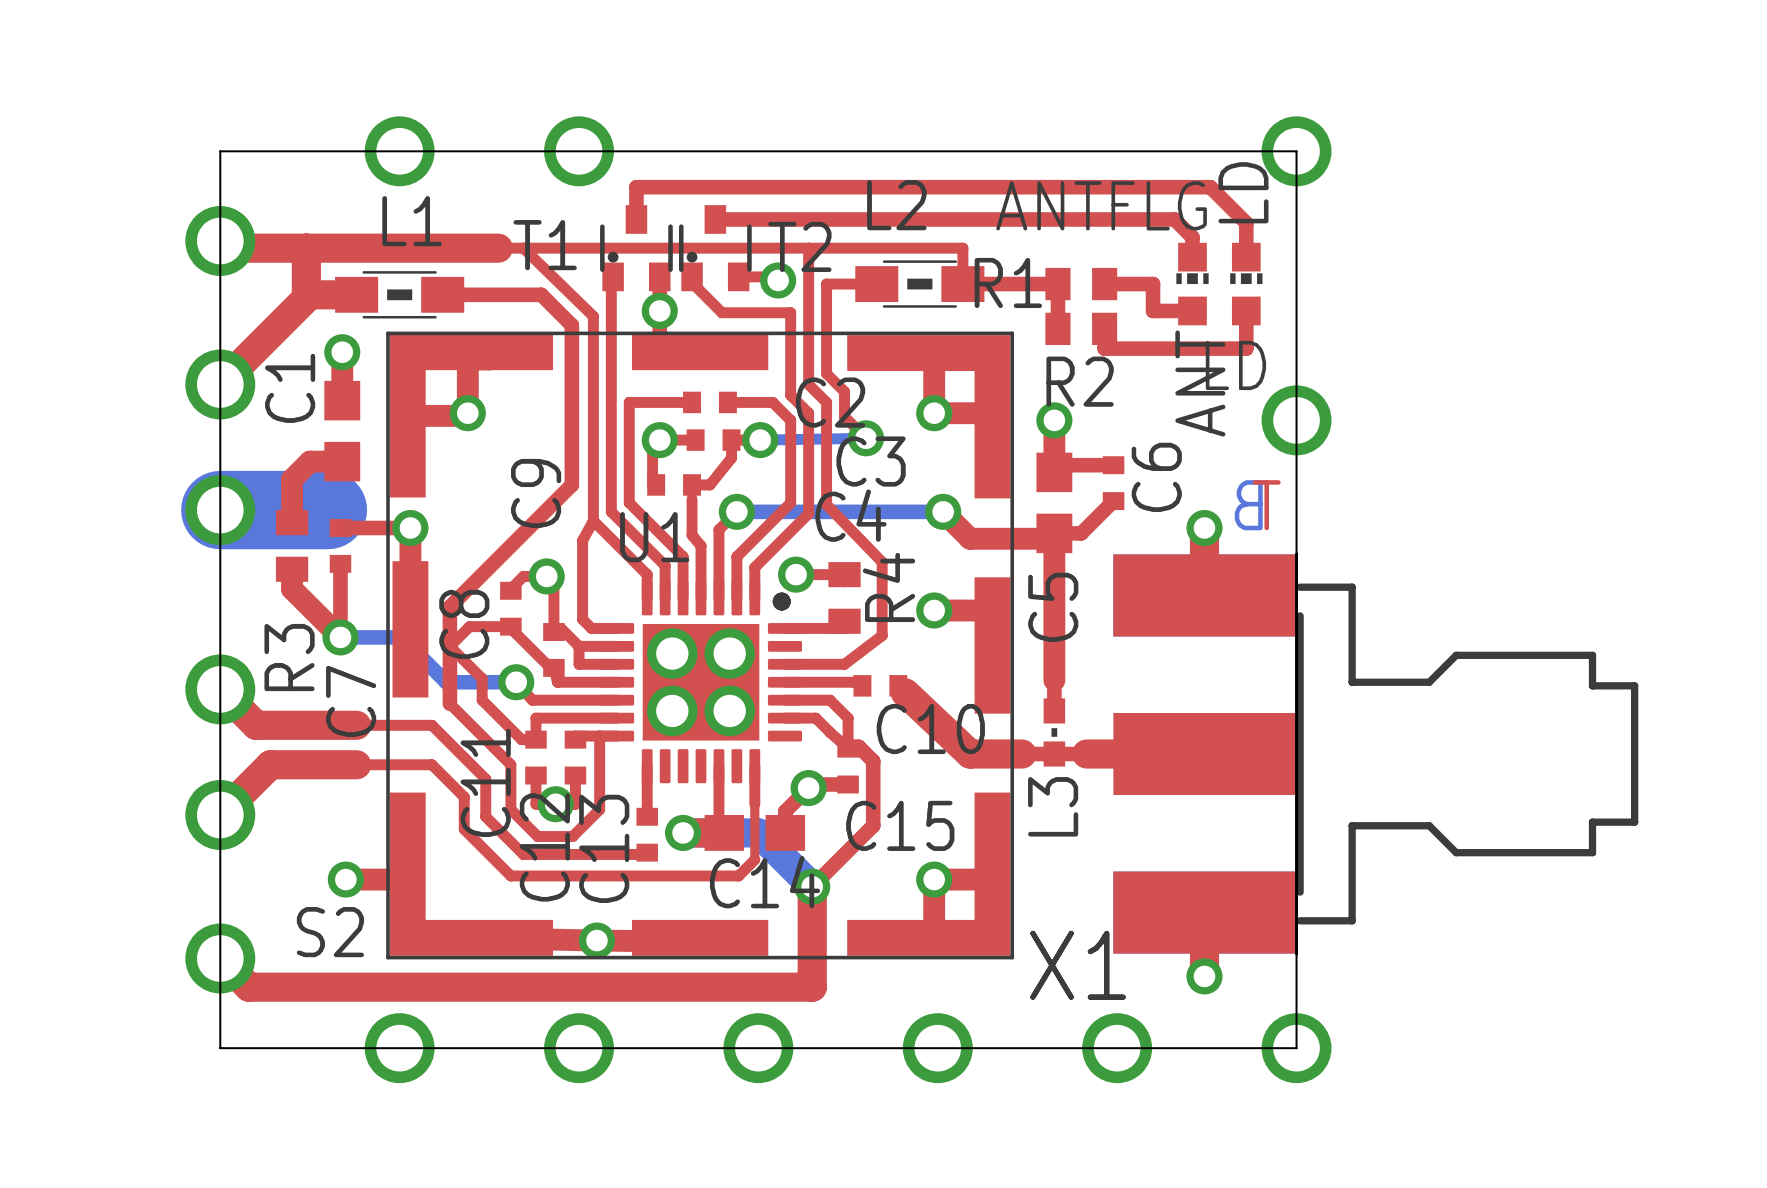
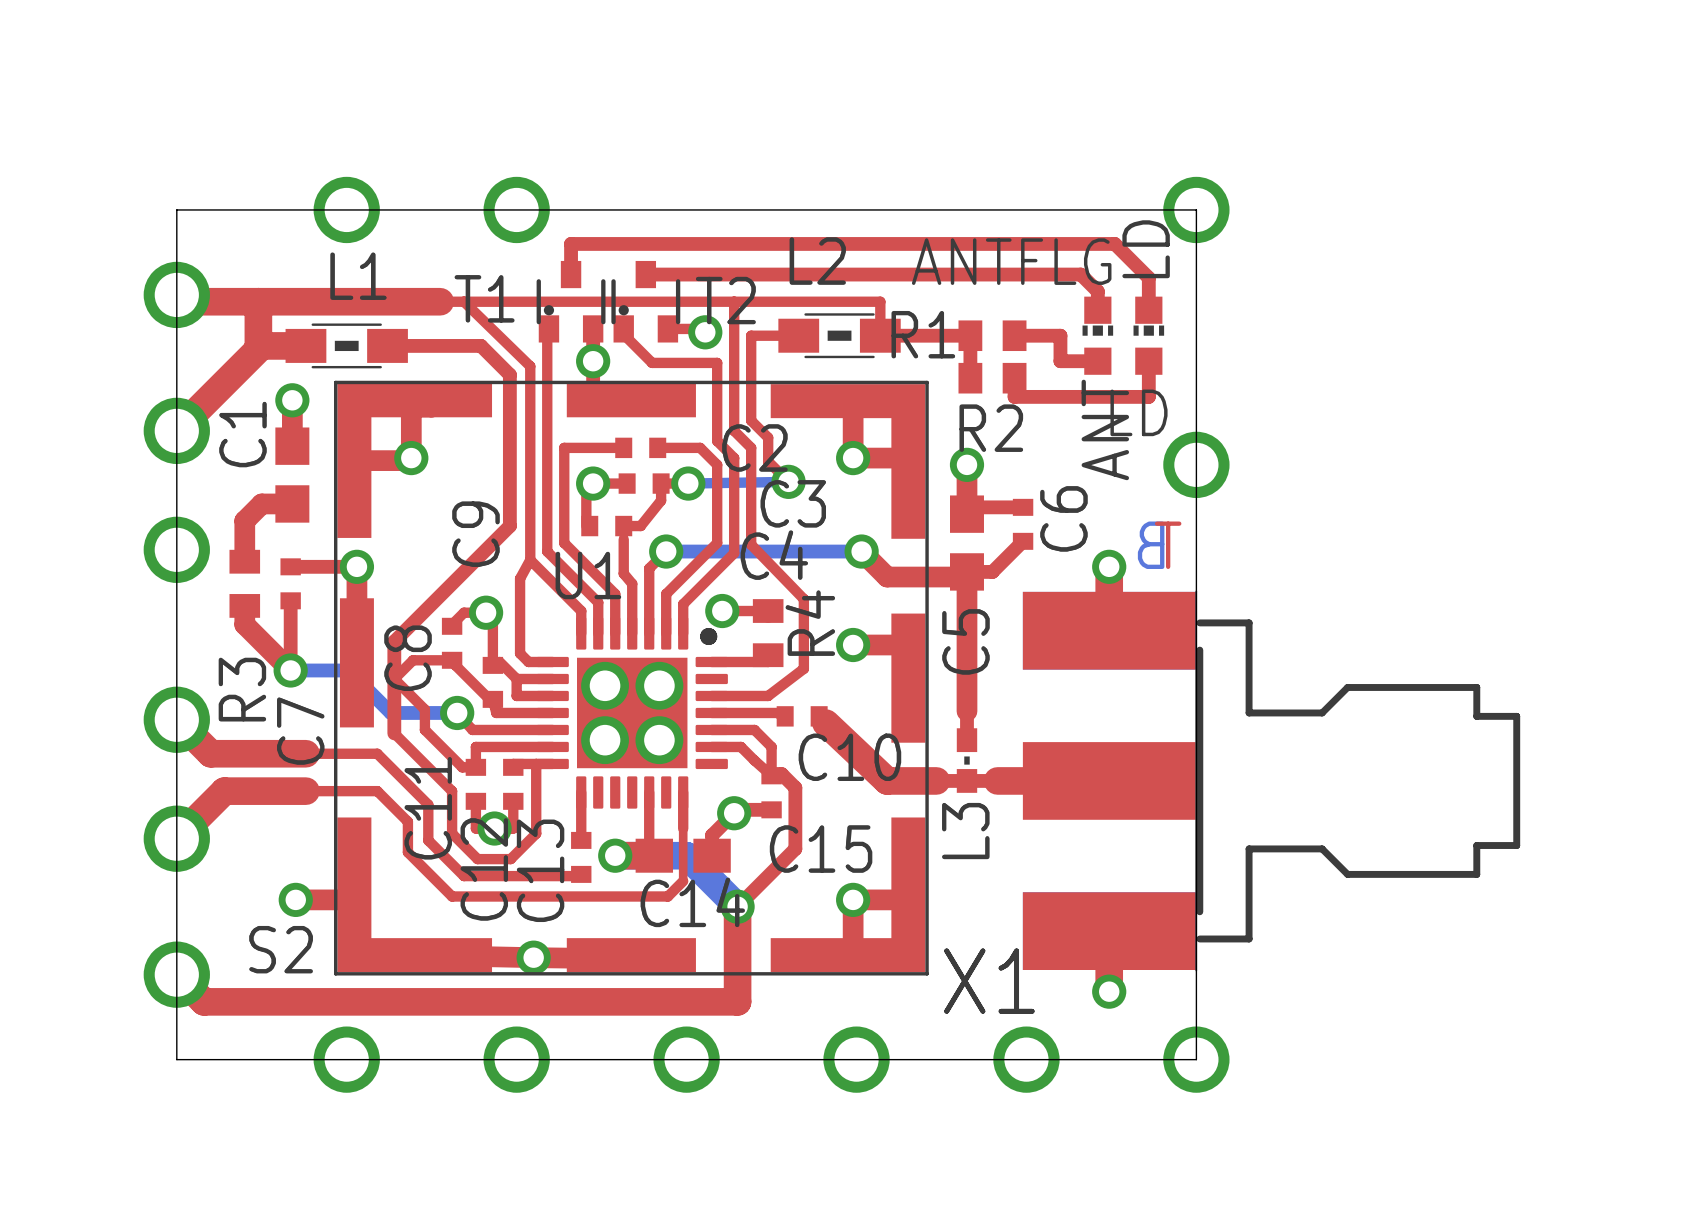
bottom track: (220, 510) (327, 510) -> none

